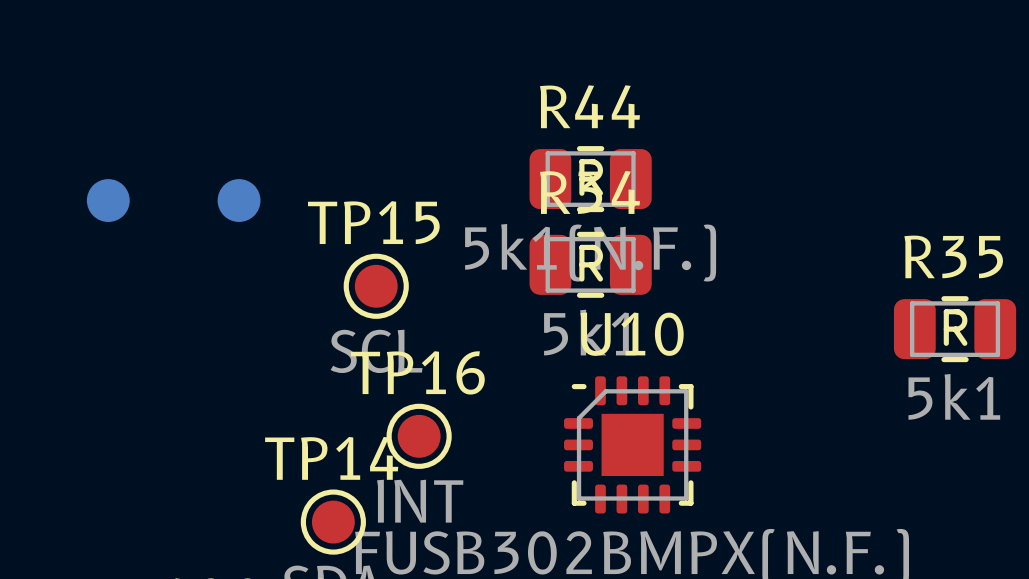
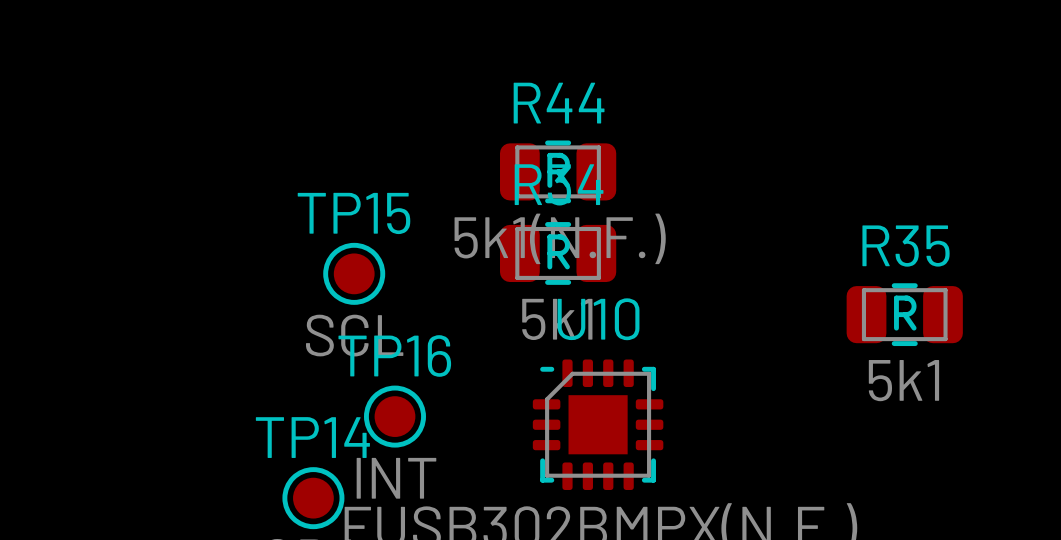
part: (108, 200) -> none
part: (239, 200) -> none

